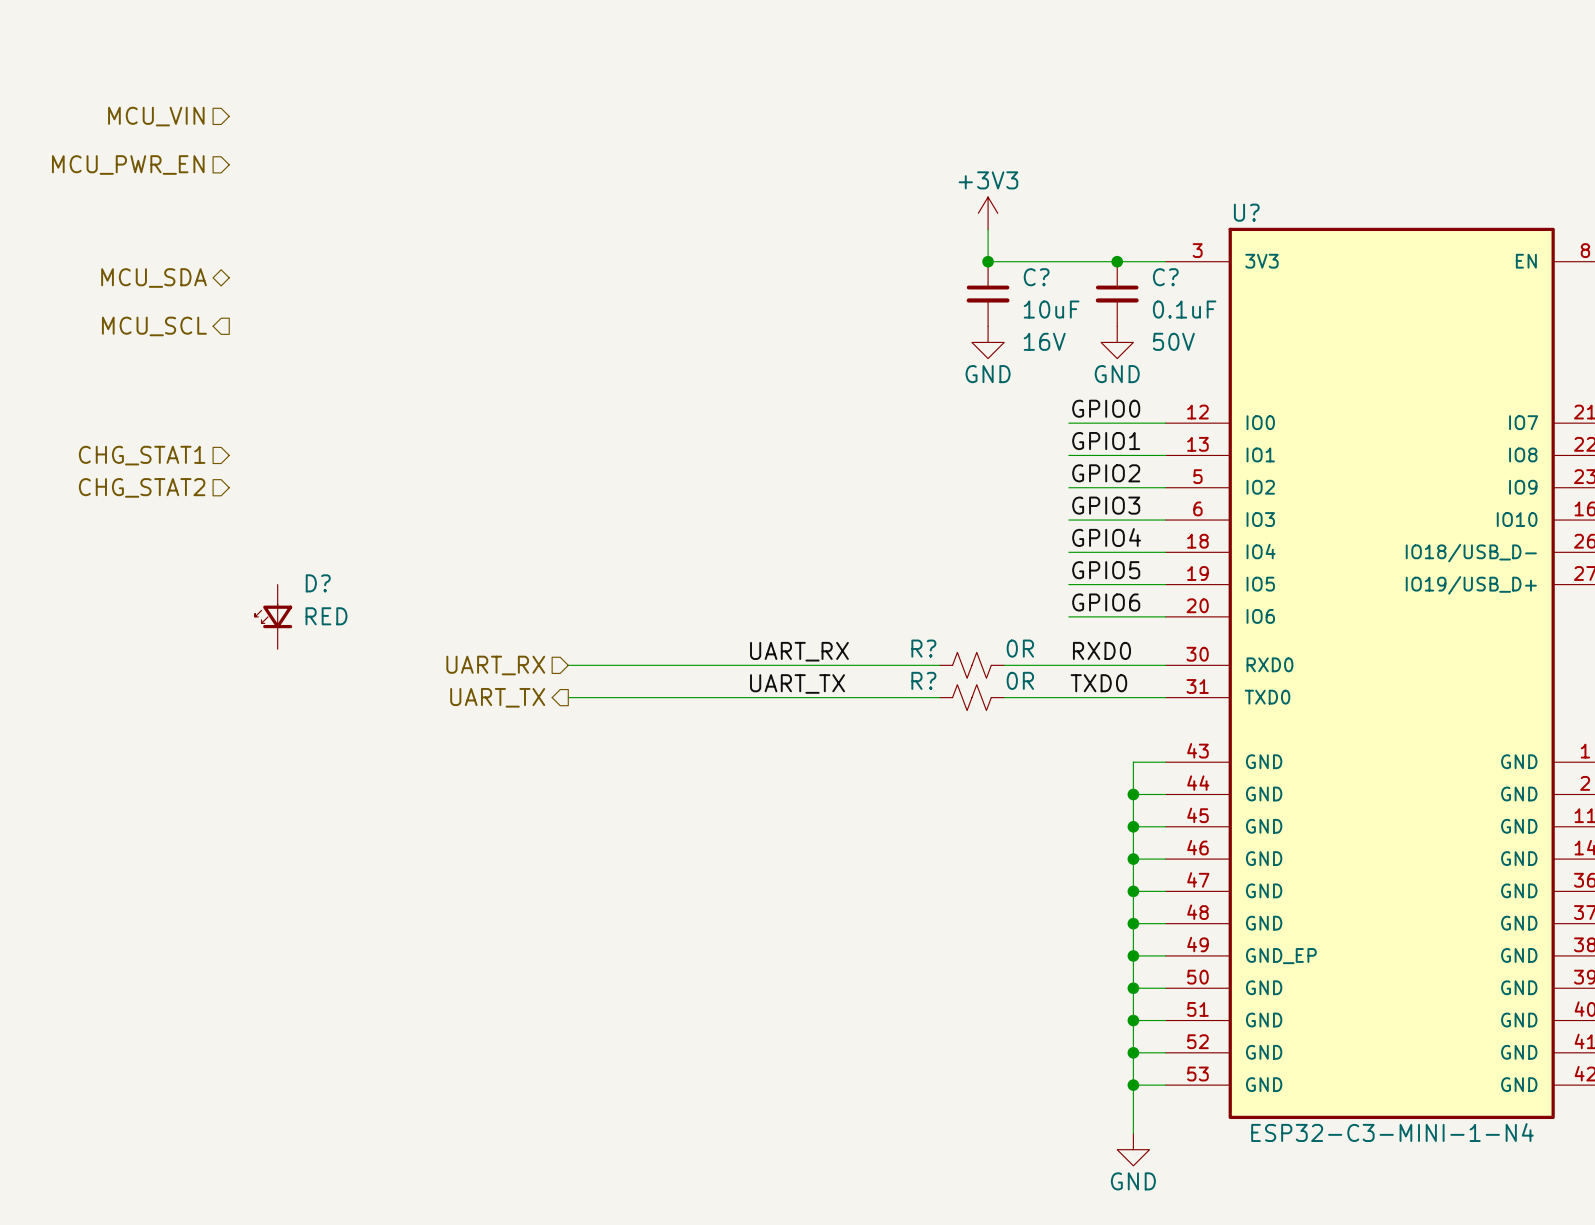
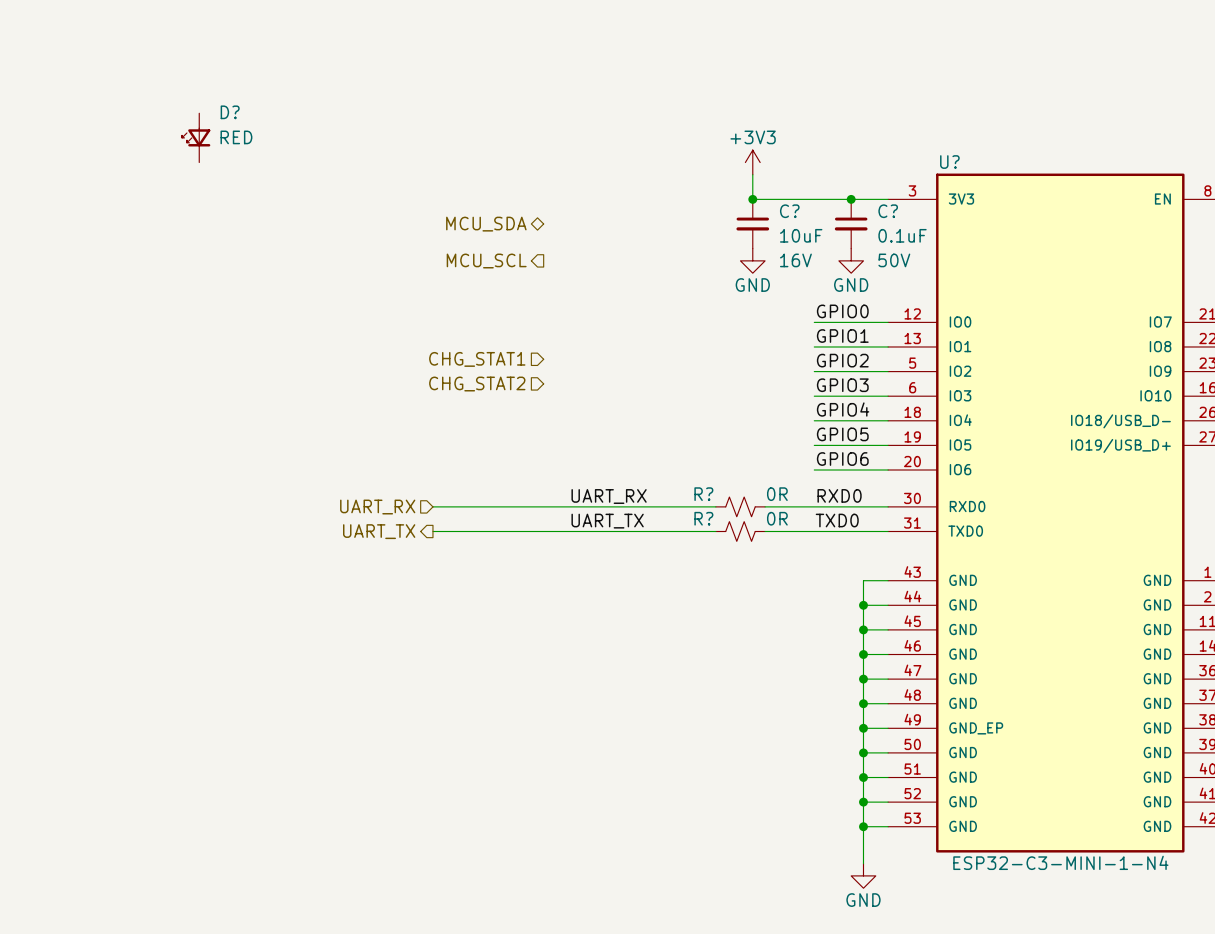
hierarchical label: MCU_VIN (156, 116) -> none
hierarchical label: MCU_PWR_EN (128, 164) -> none
D?: none -> RED (196, 137)
hierarchical label: MCU_SDA (154, 278) -> none
hierarchical label: none -> MCU_SDA (486, 224)
hierarchical label: MCU_SCL (154, 326) -> none
hierarchical label: none -> MCU_SCL (486, 261)
hierarchical label: CHG_STAT1 (142, 455) -> none
hierarchical label: none -> CHG_STAT1 (477, 359)
hierarchical label: CHG_STAT2 (142, 487) -> none
hierarchical label: none -> CHG_STAT2 (477, 384)
D?: RED (273, 616) -> none

